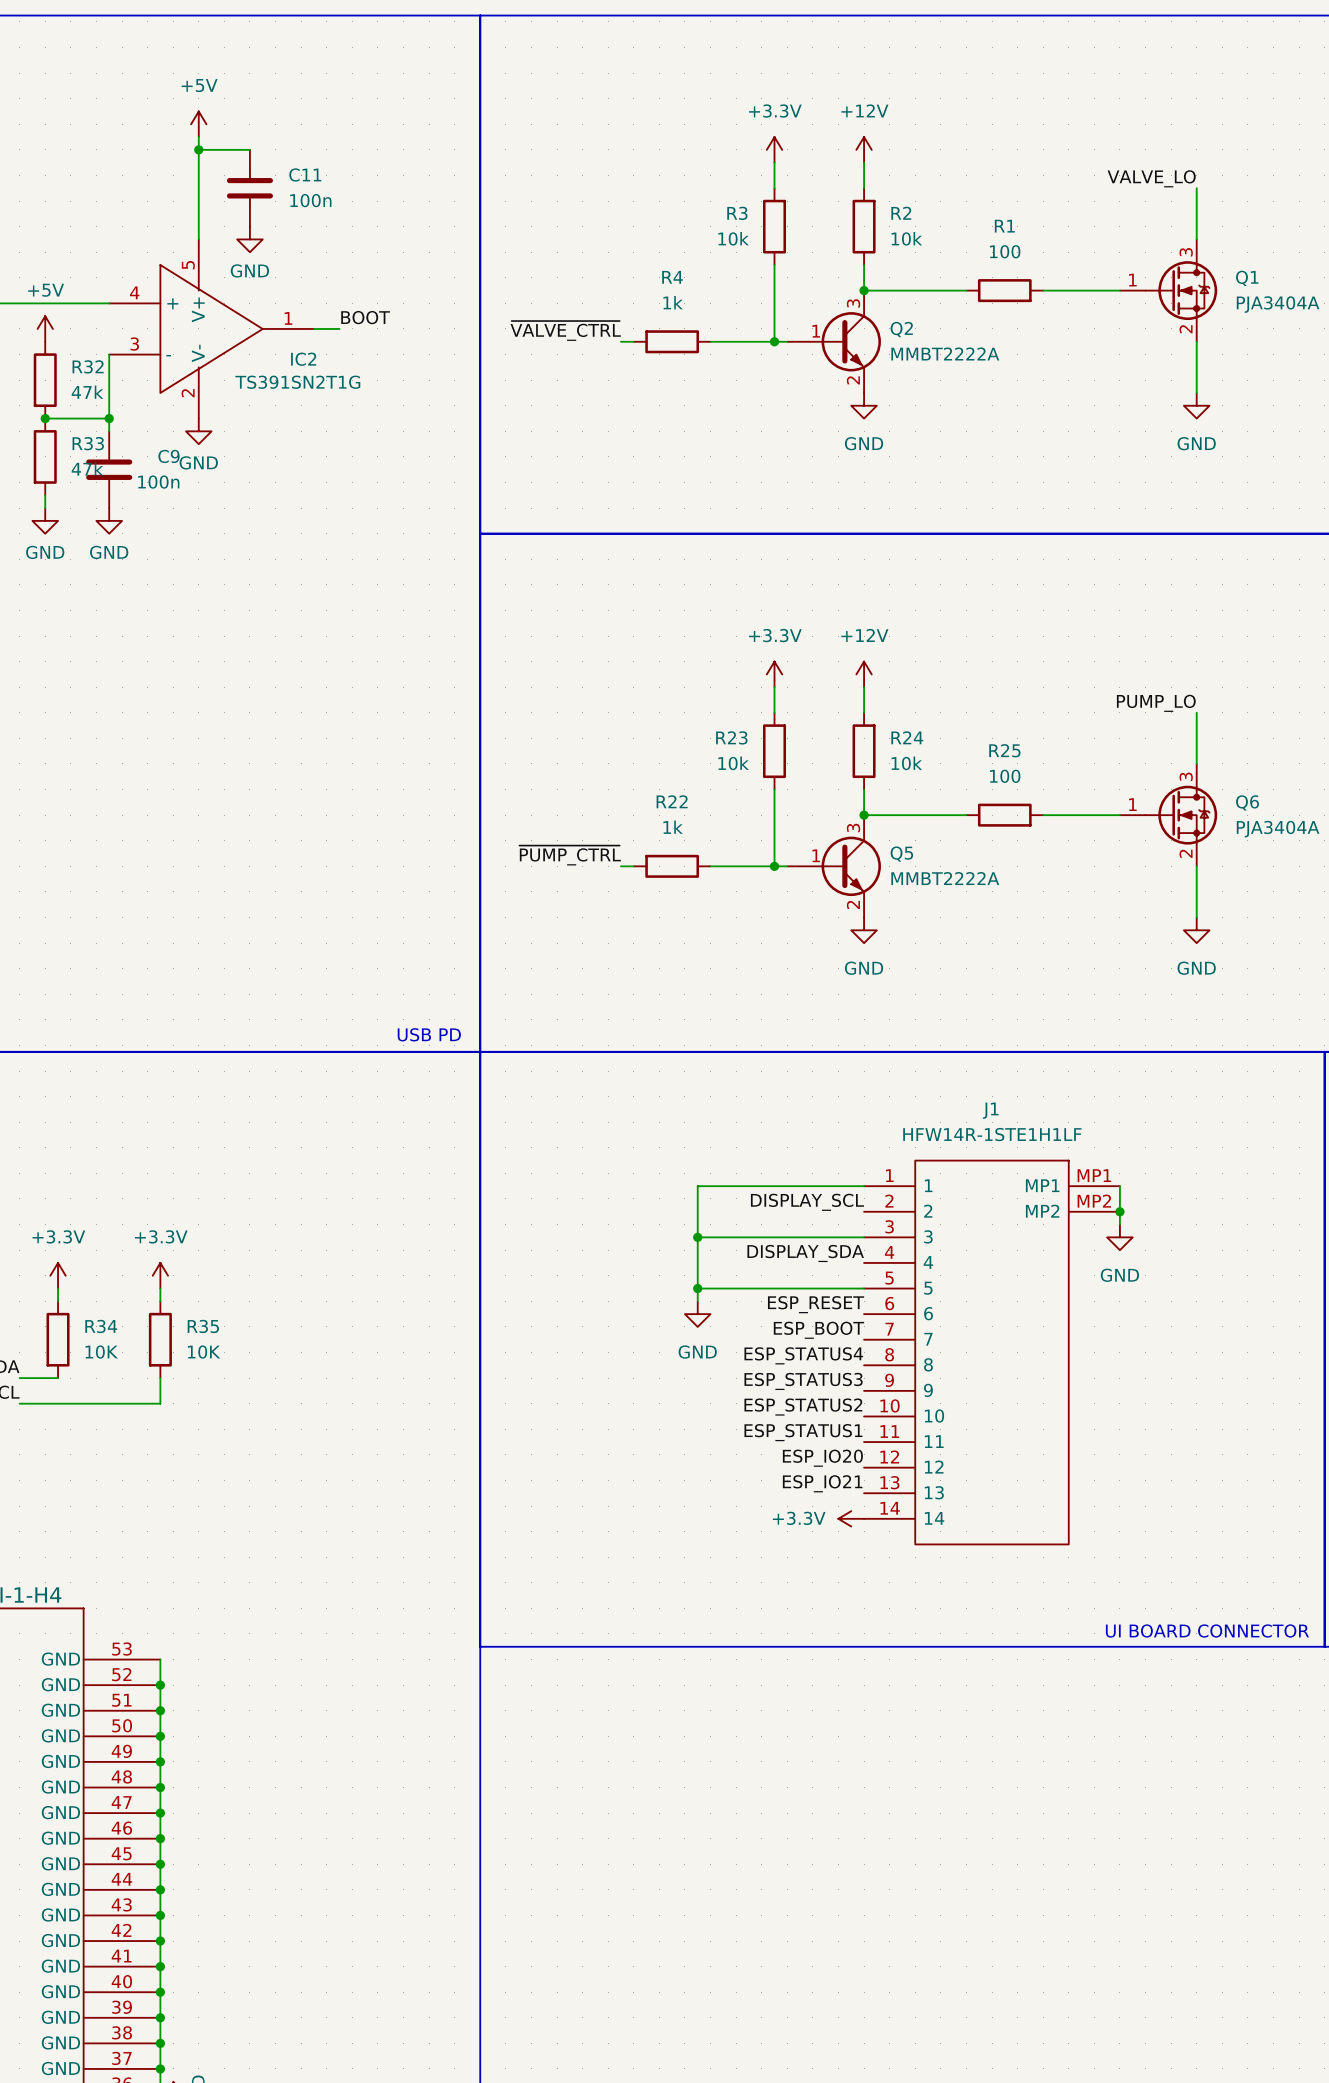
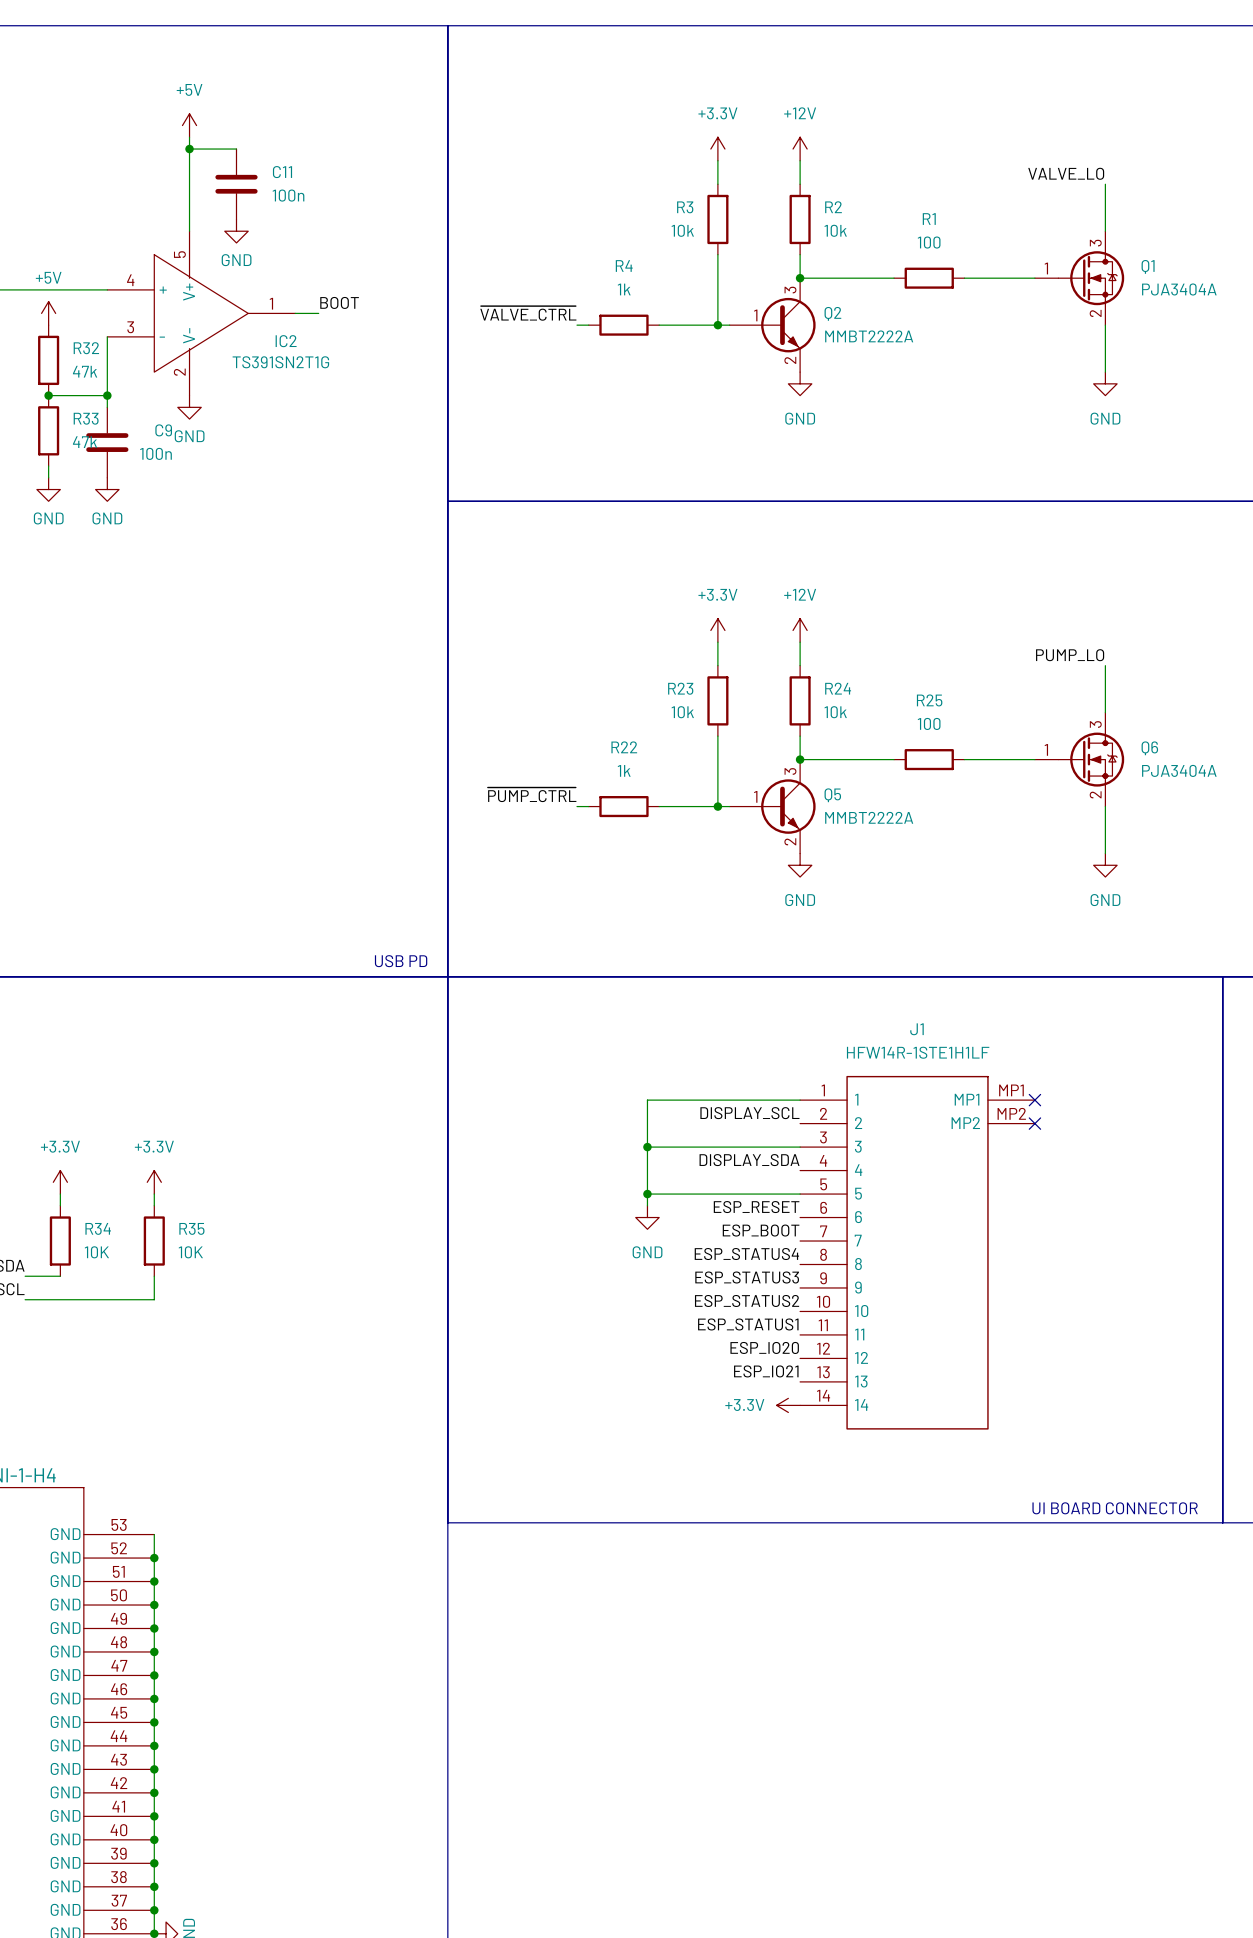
wire: (1119, 1186) (1119, 1224) -> none
no-connect mark: none -> (1034, 1100)
junction: (1119, 1211) -> none
no-connect mark: none -> (1034, 1123)
power symbol: GND (1119, 1237) -> none

